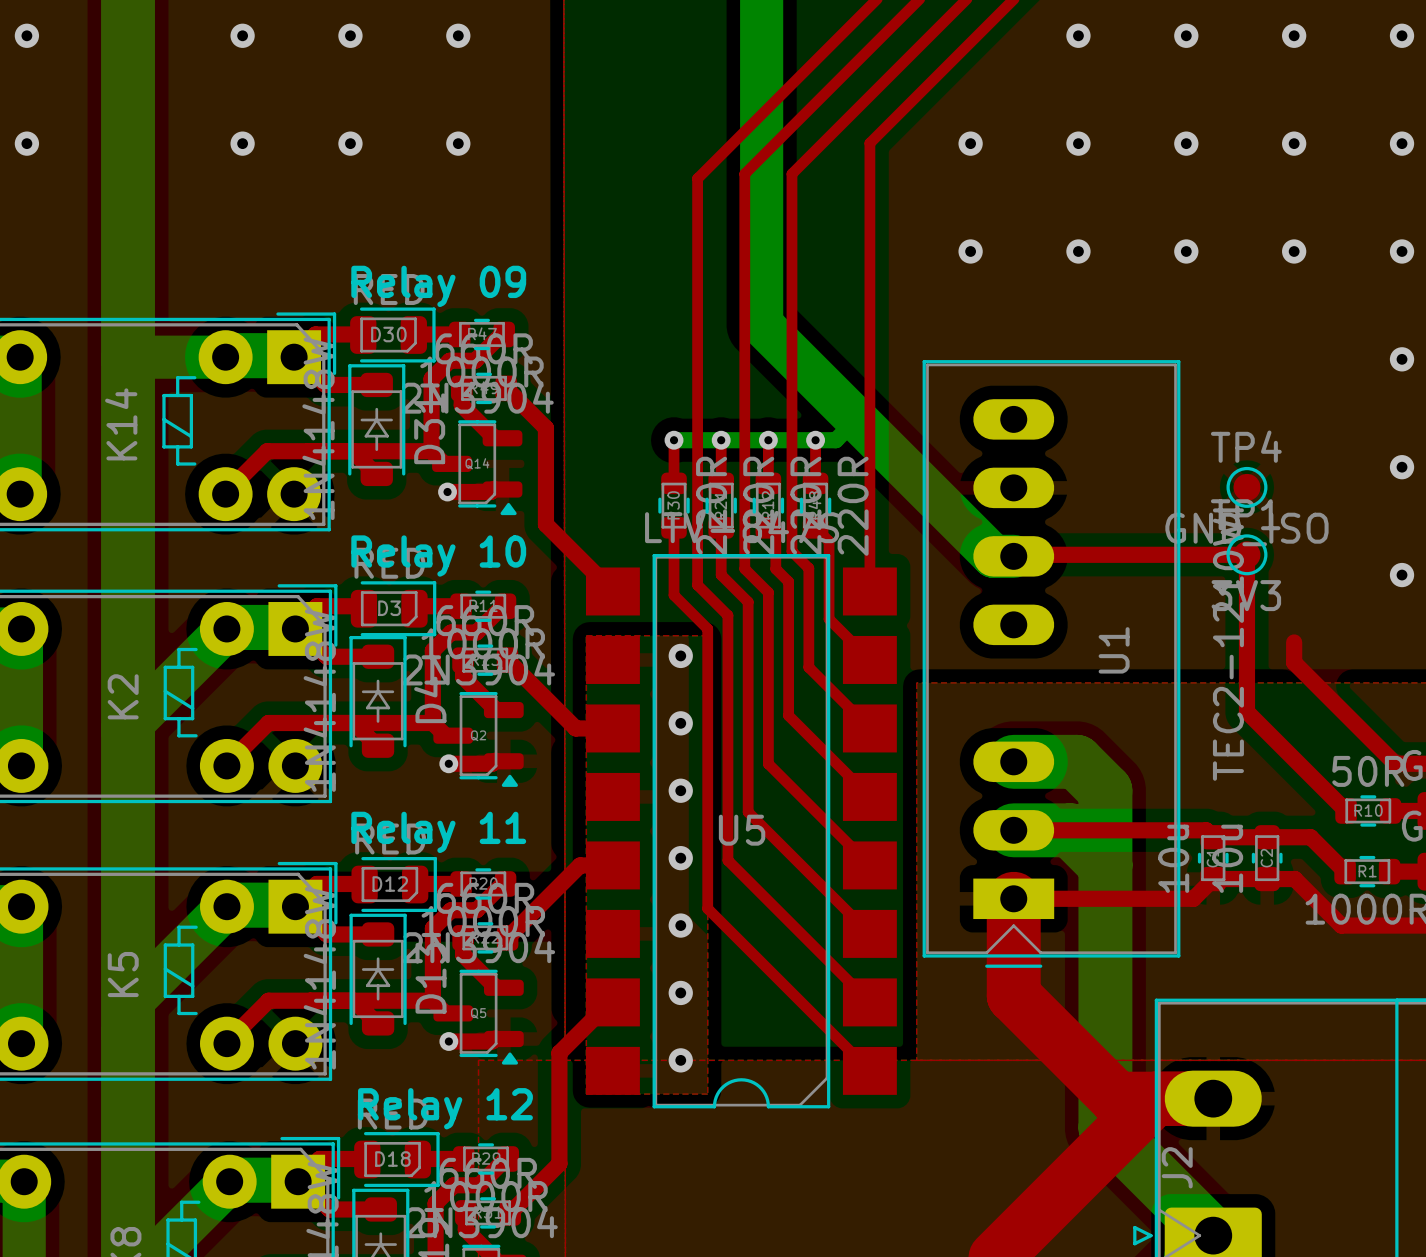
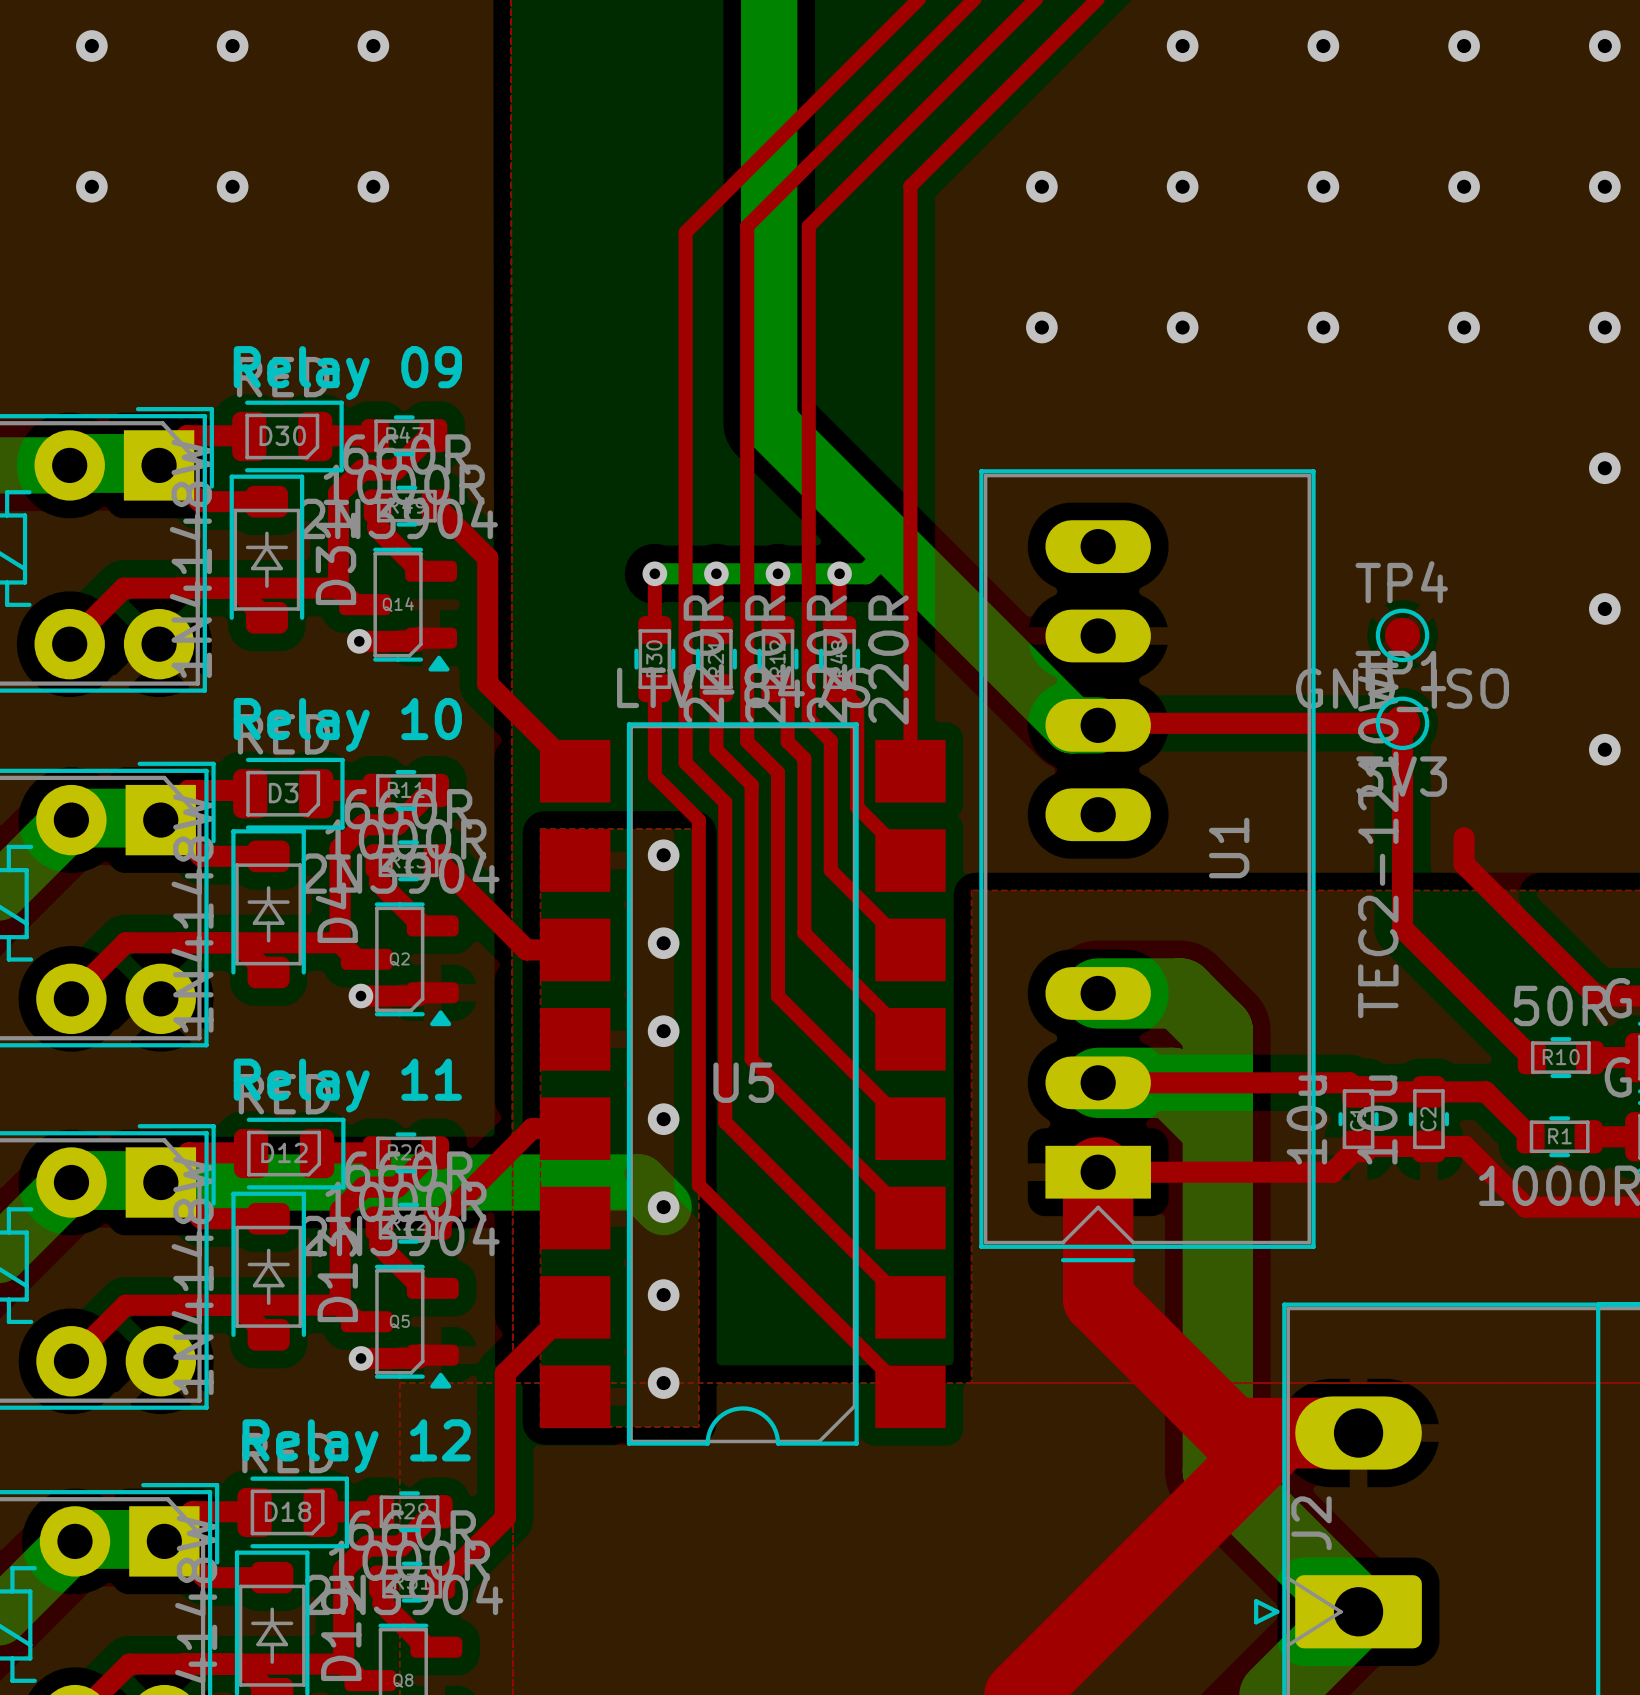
bottom track: none -> (160, 1182) (639, 1182) (663, 1207)

